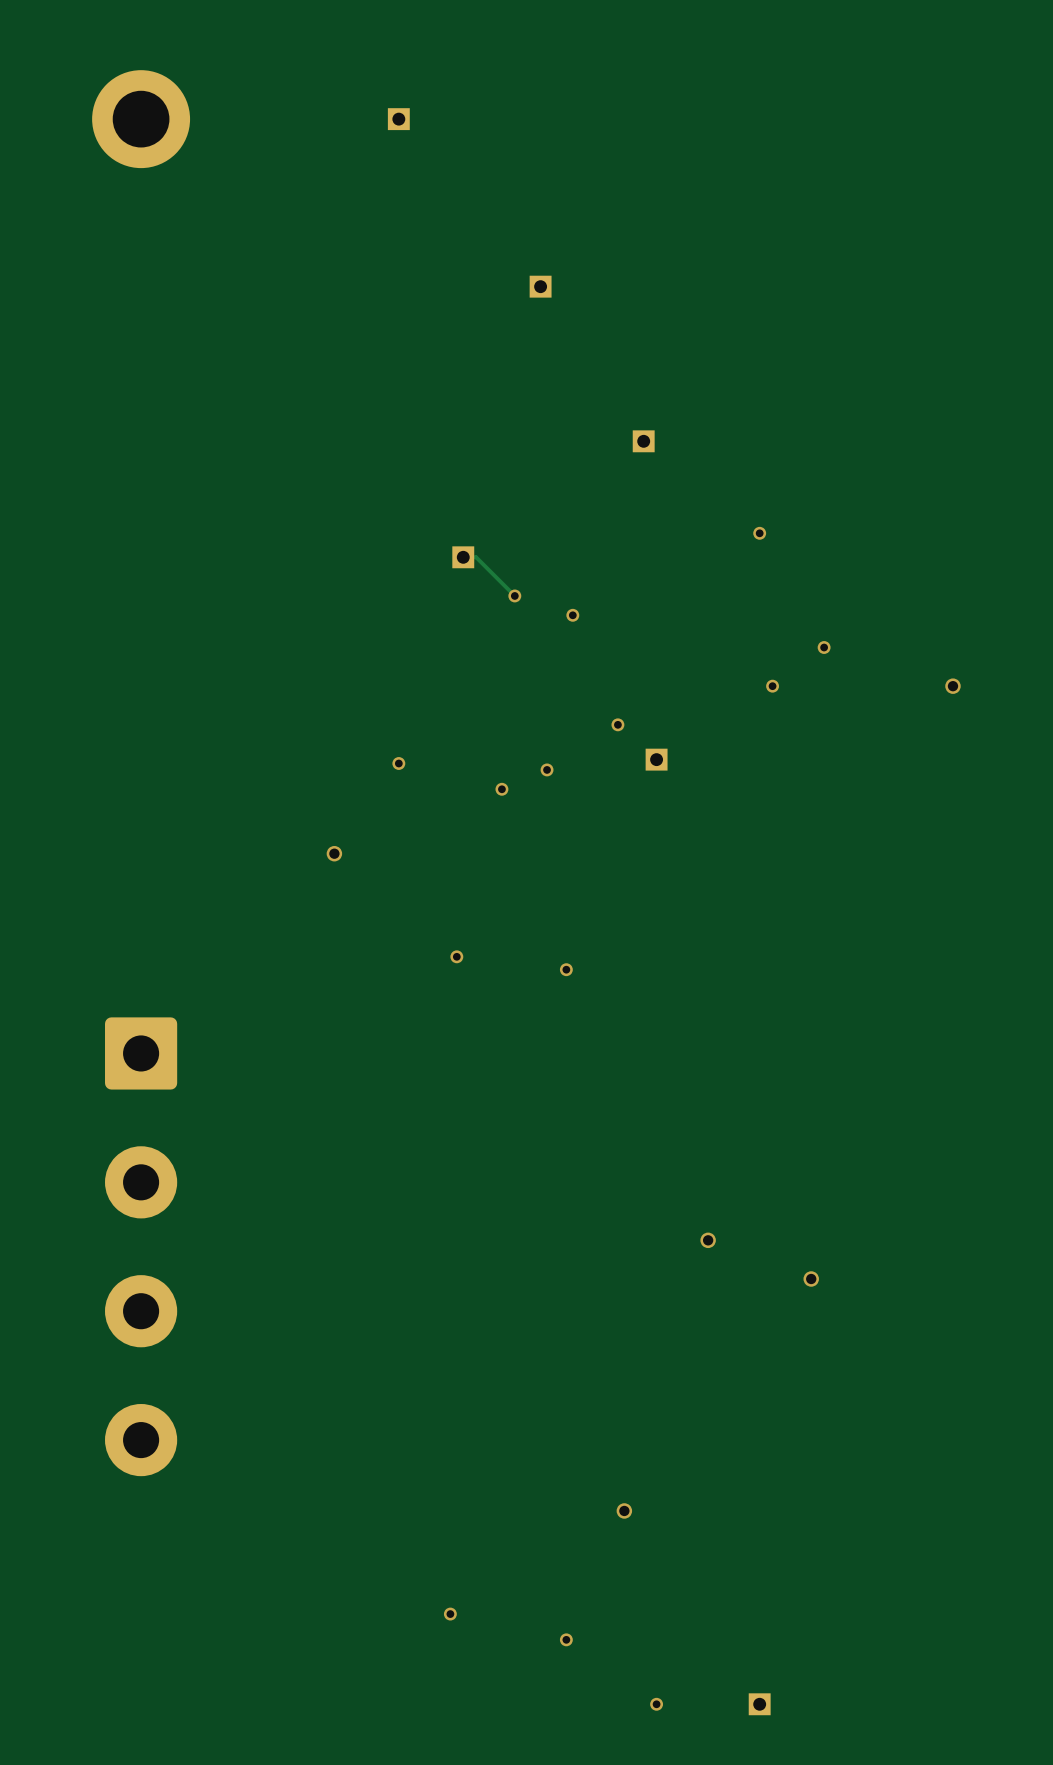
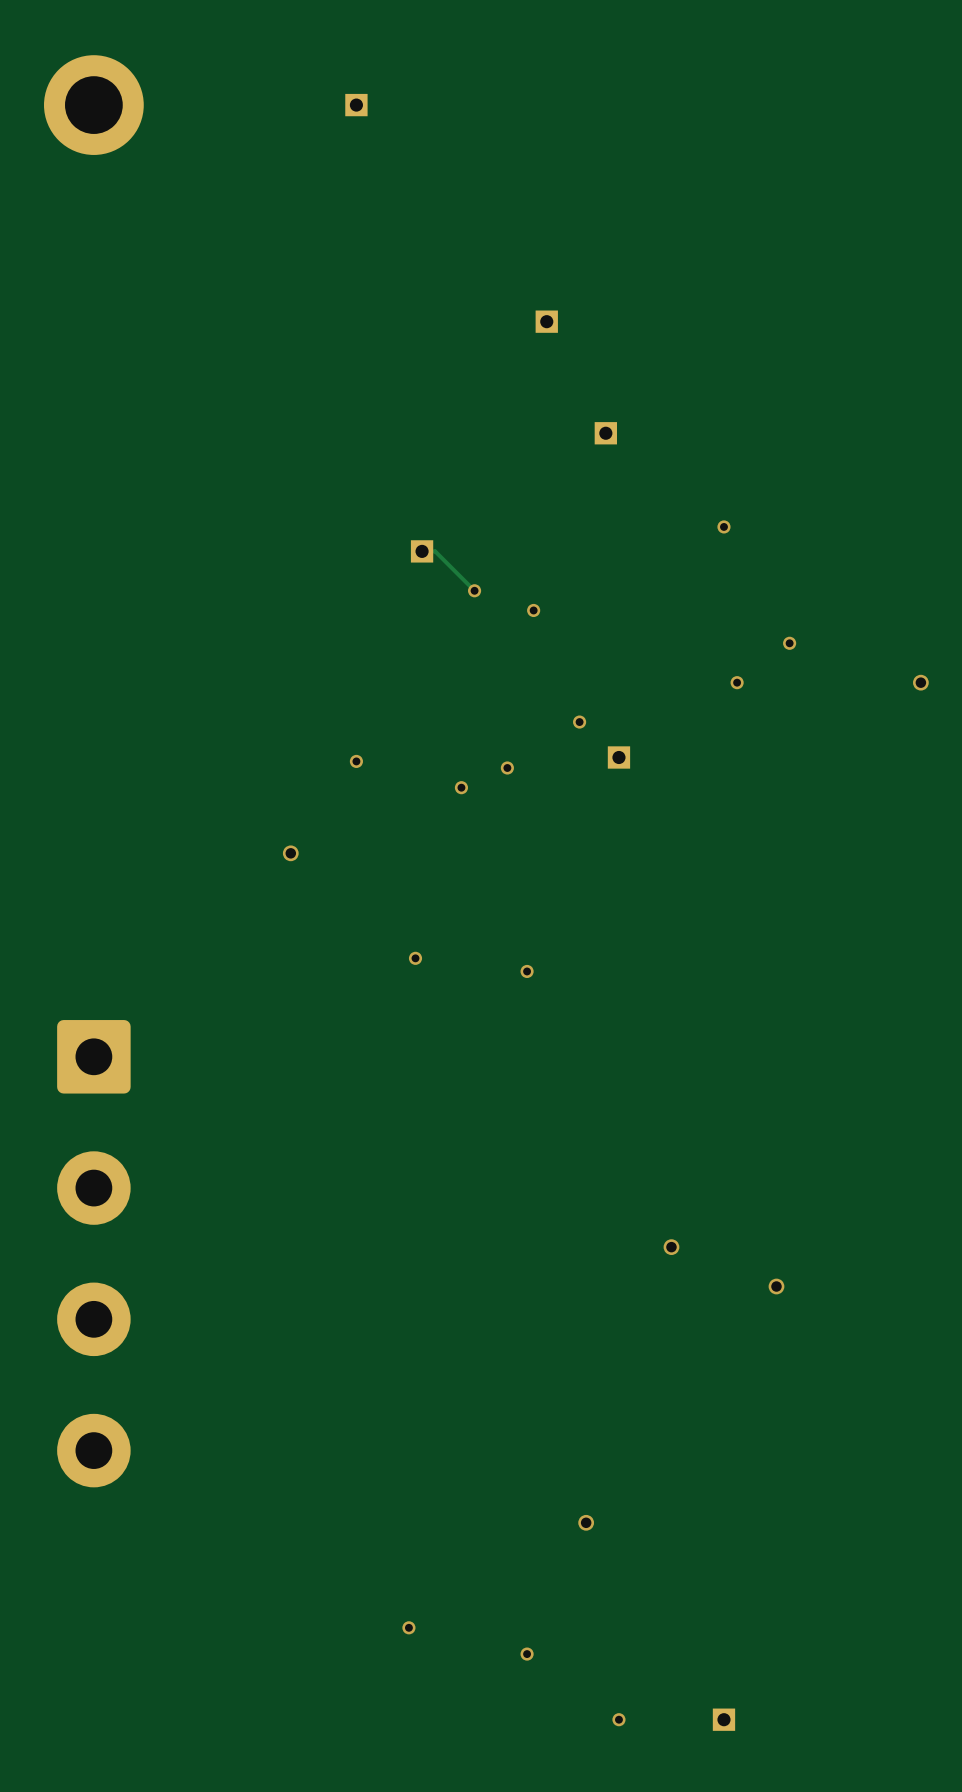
part position: (540, 286) -> (546, 321)

